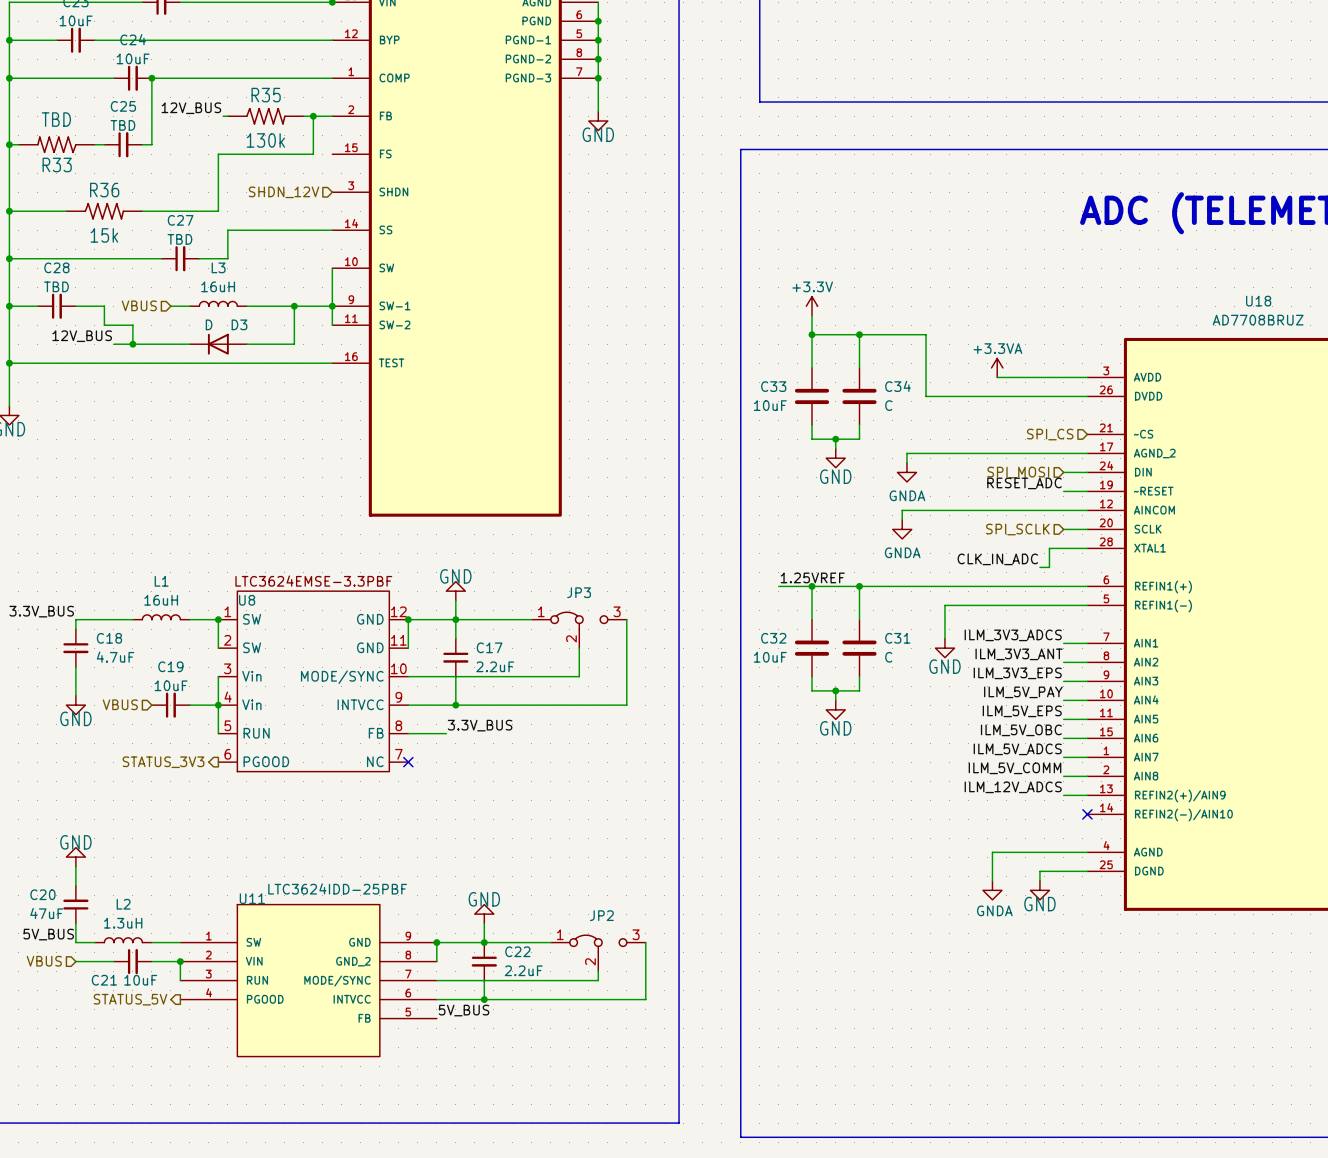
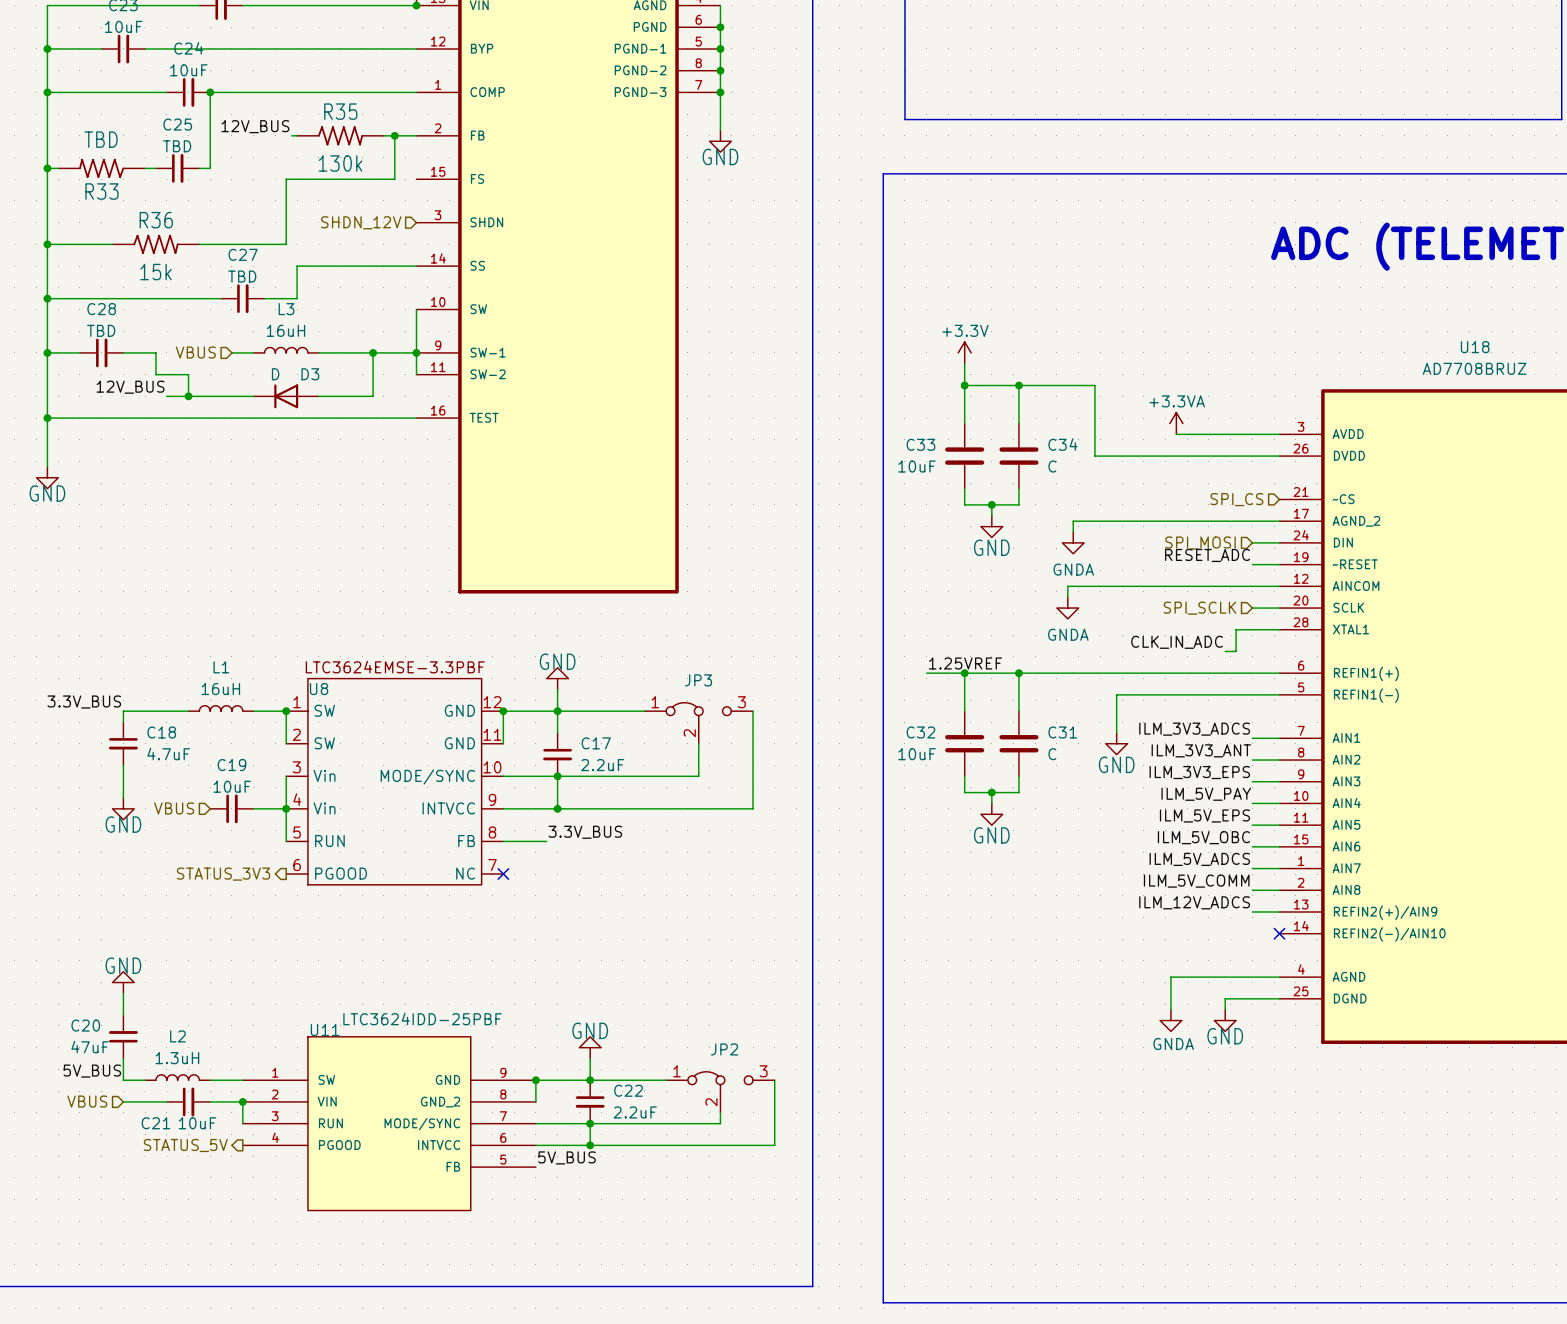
junction: none -> (557, 776)
junction: none -> (590, 1123)

